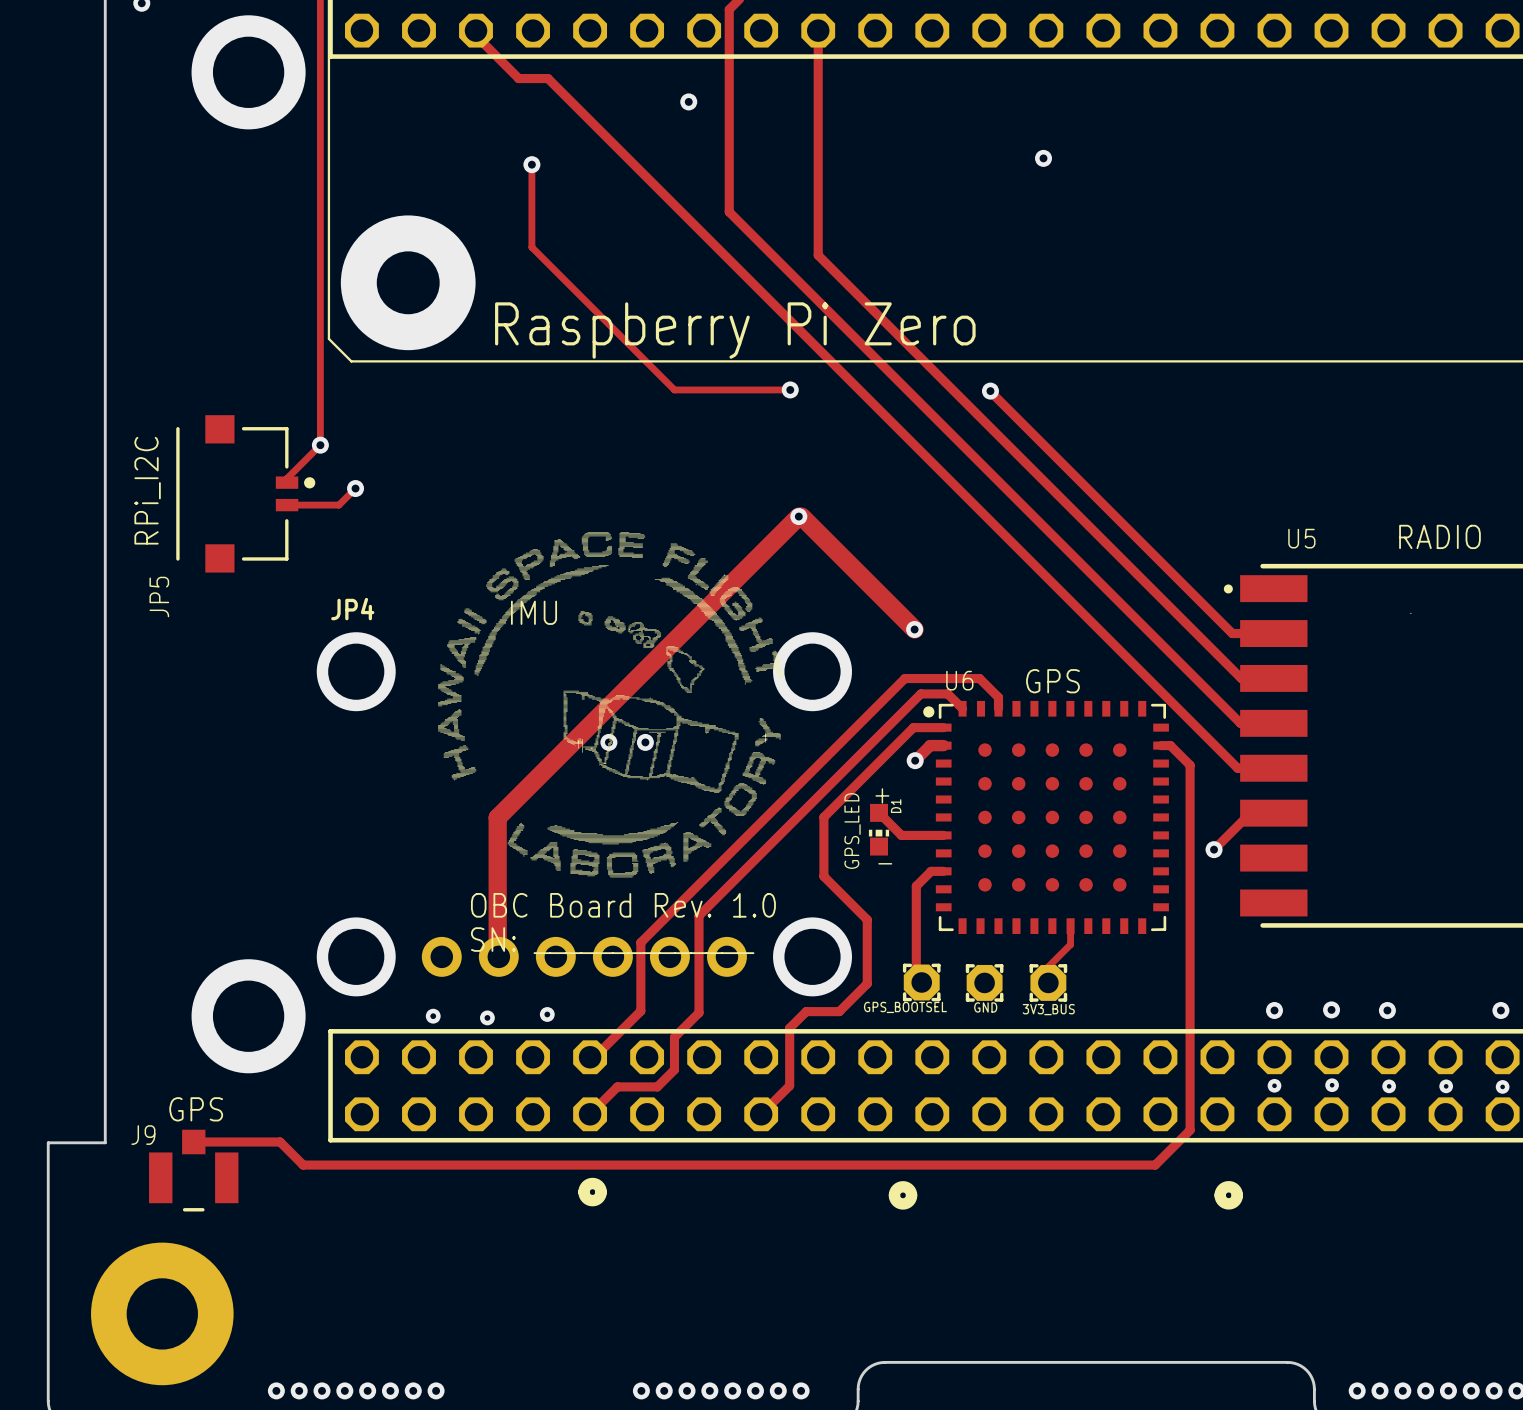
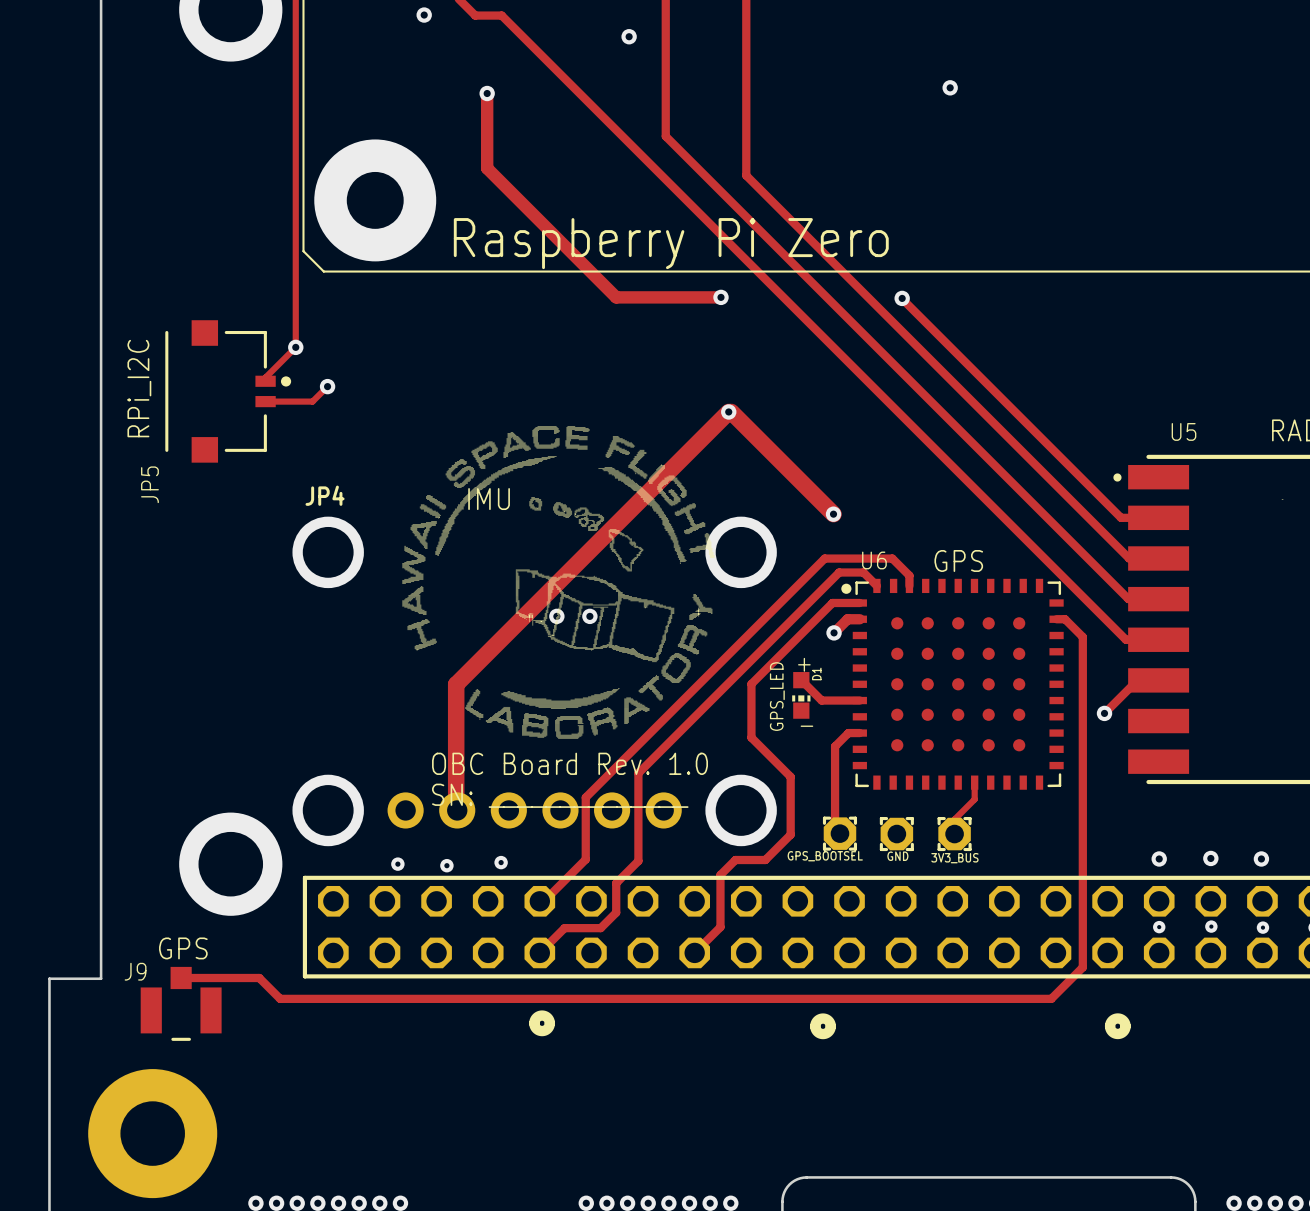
via: none -> (424, 15)
track width: thin (531, 164) (531, 247) (674, 389) (790, 389) -> thick (487, 93) (487, 168) (616, 297) (721, 297)

